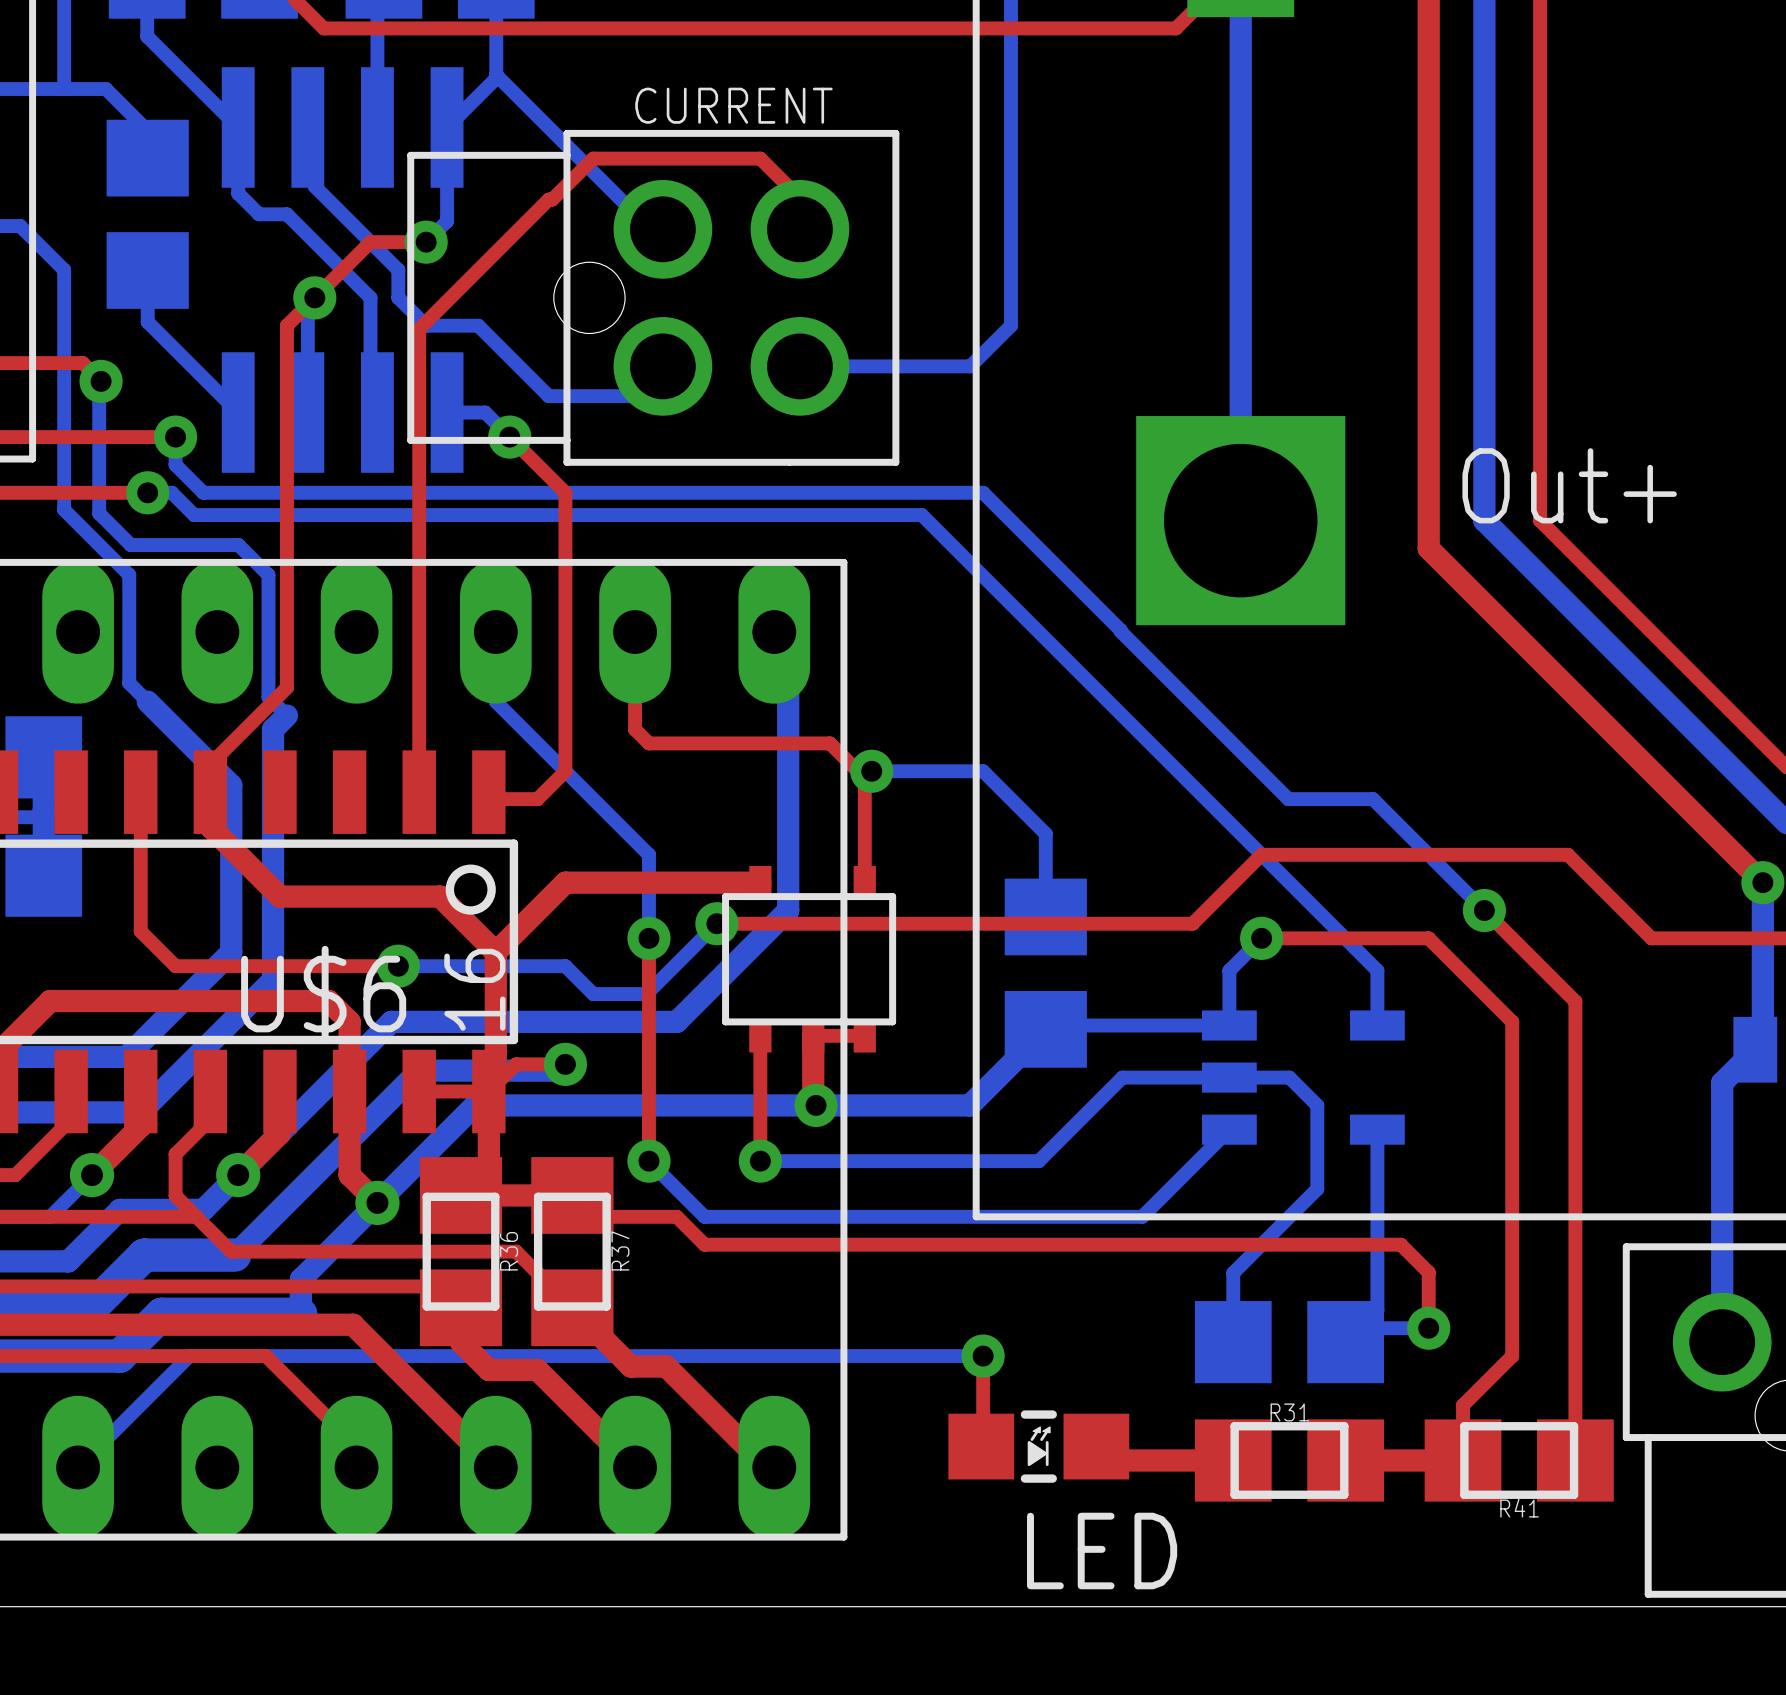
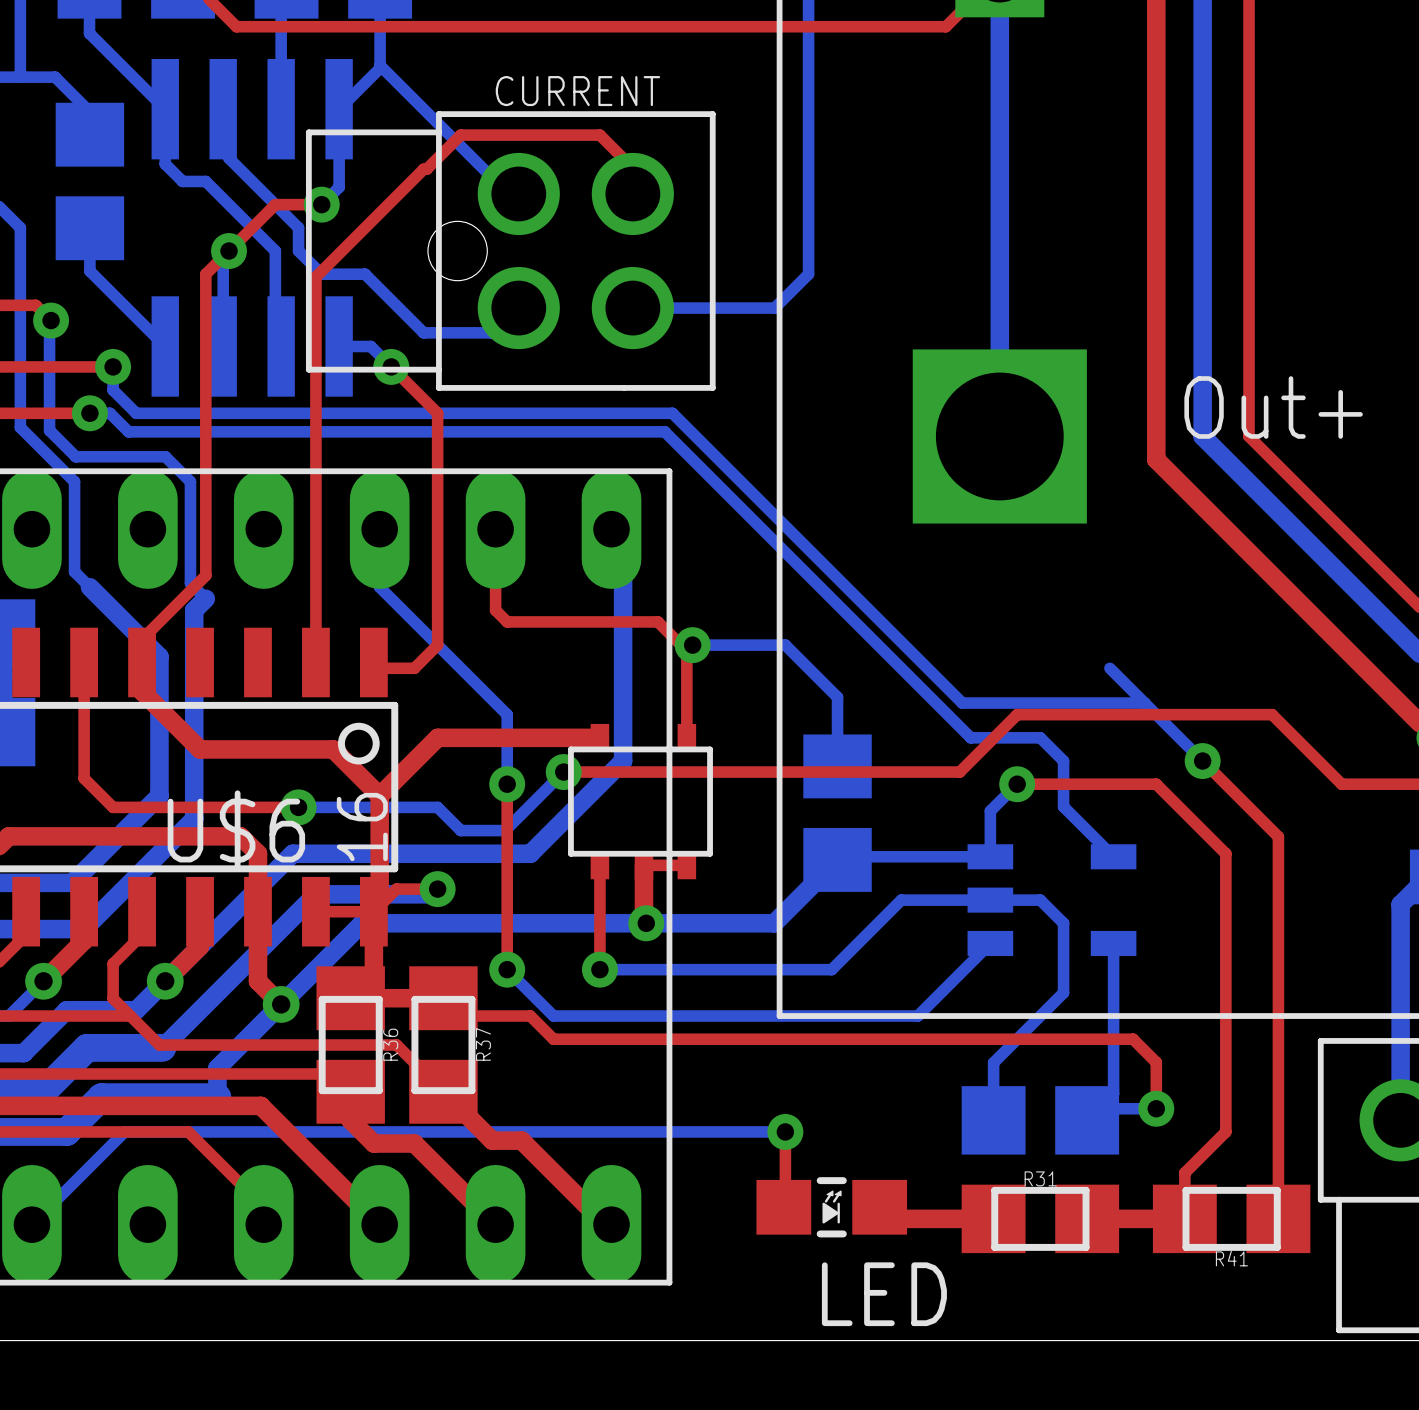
bottom track: (847, 492) (983, 492) (1288, 799) (1373, 799) -> (672, 413) (962, 703) (1144, 703)
bottom track: (838, 515) (921, 515) (1289, 882) -> (664, 431) (970, 737) (1040, 737)
bottom track: (1317, 910) (1377, 970) (1377, 1025) -> (1063, 761) (1063, 806) (1113, 856)

